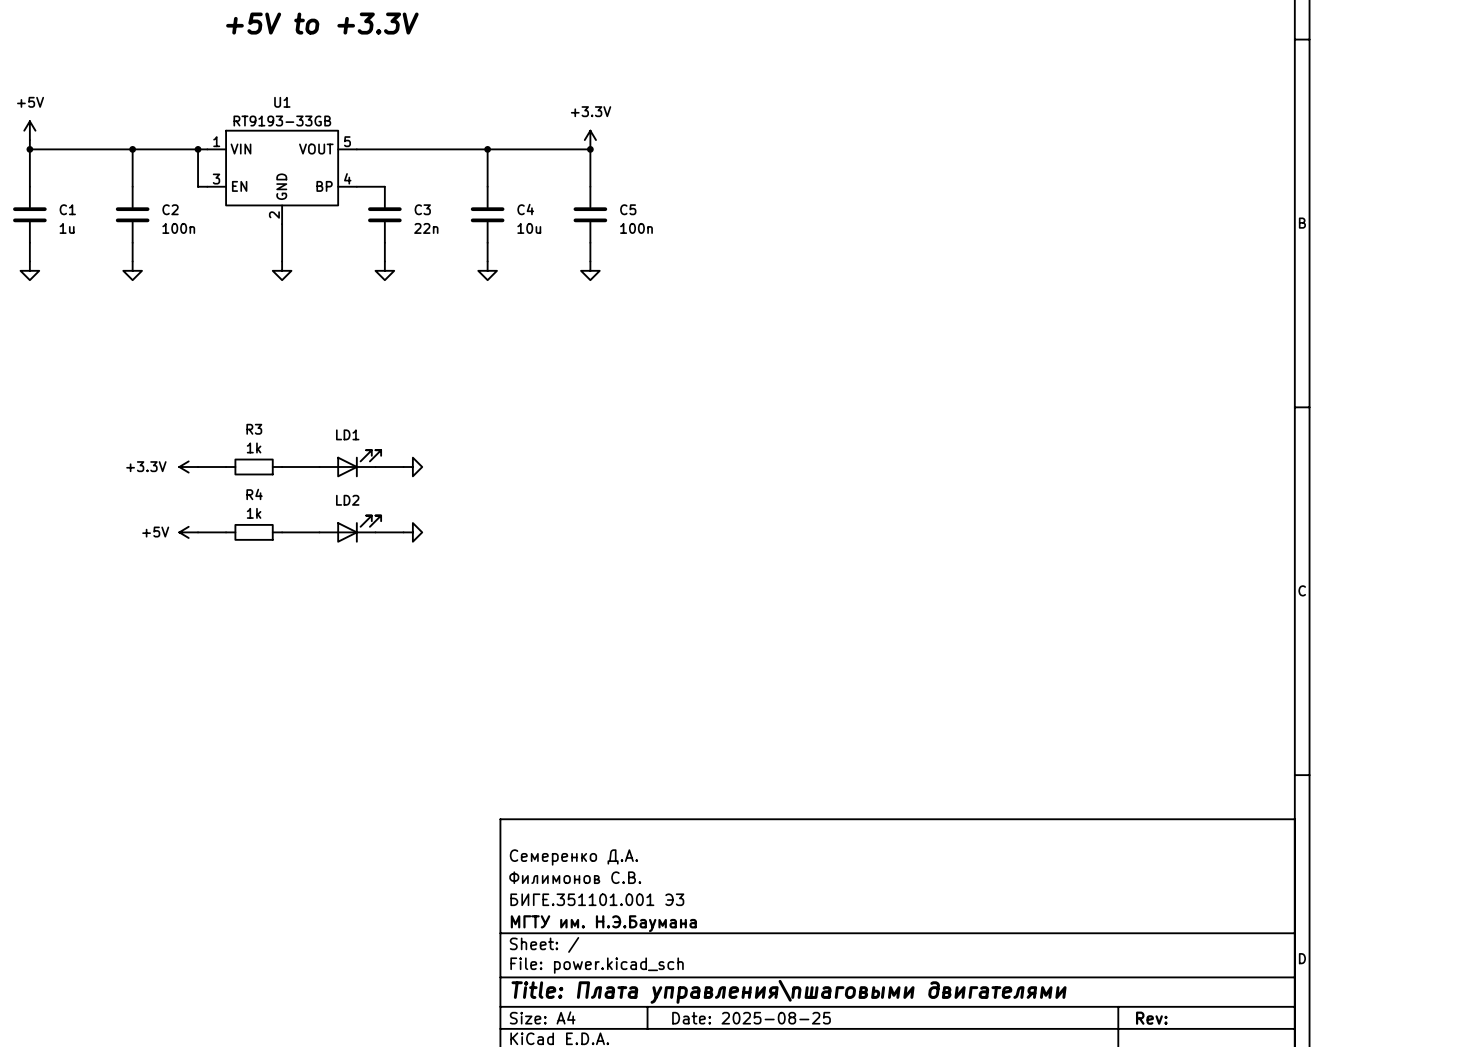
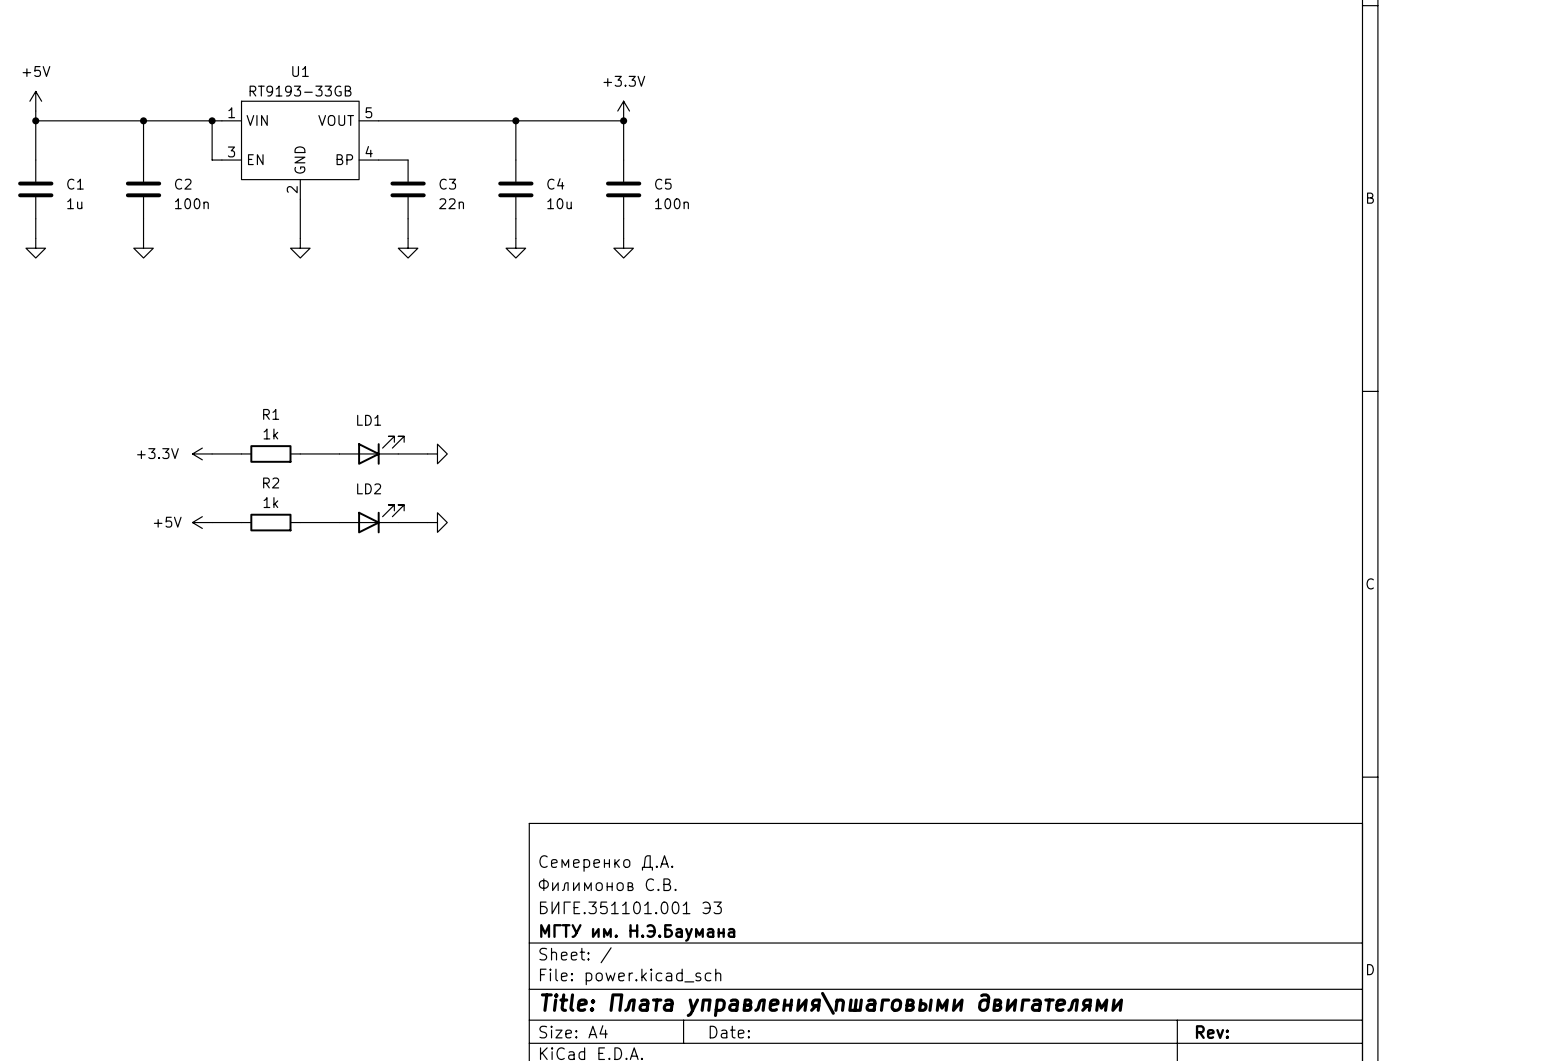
R3 name: R3 (254, 429) -> R1 (271, 414)
R4 name: R4 (254, 494) -> R2 (271, 482)
title block: Date: 2025-08-25 (751, 1018) -> Date: (729, 1032)

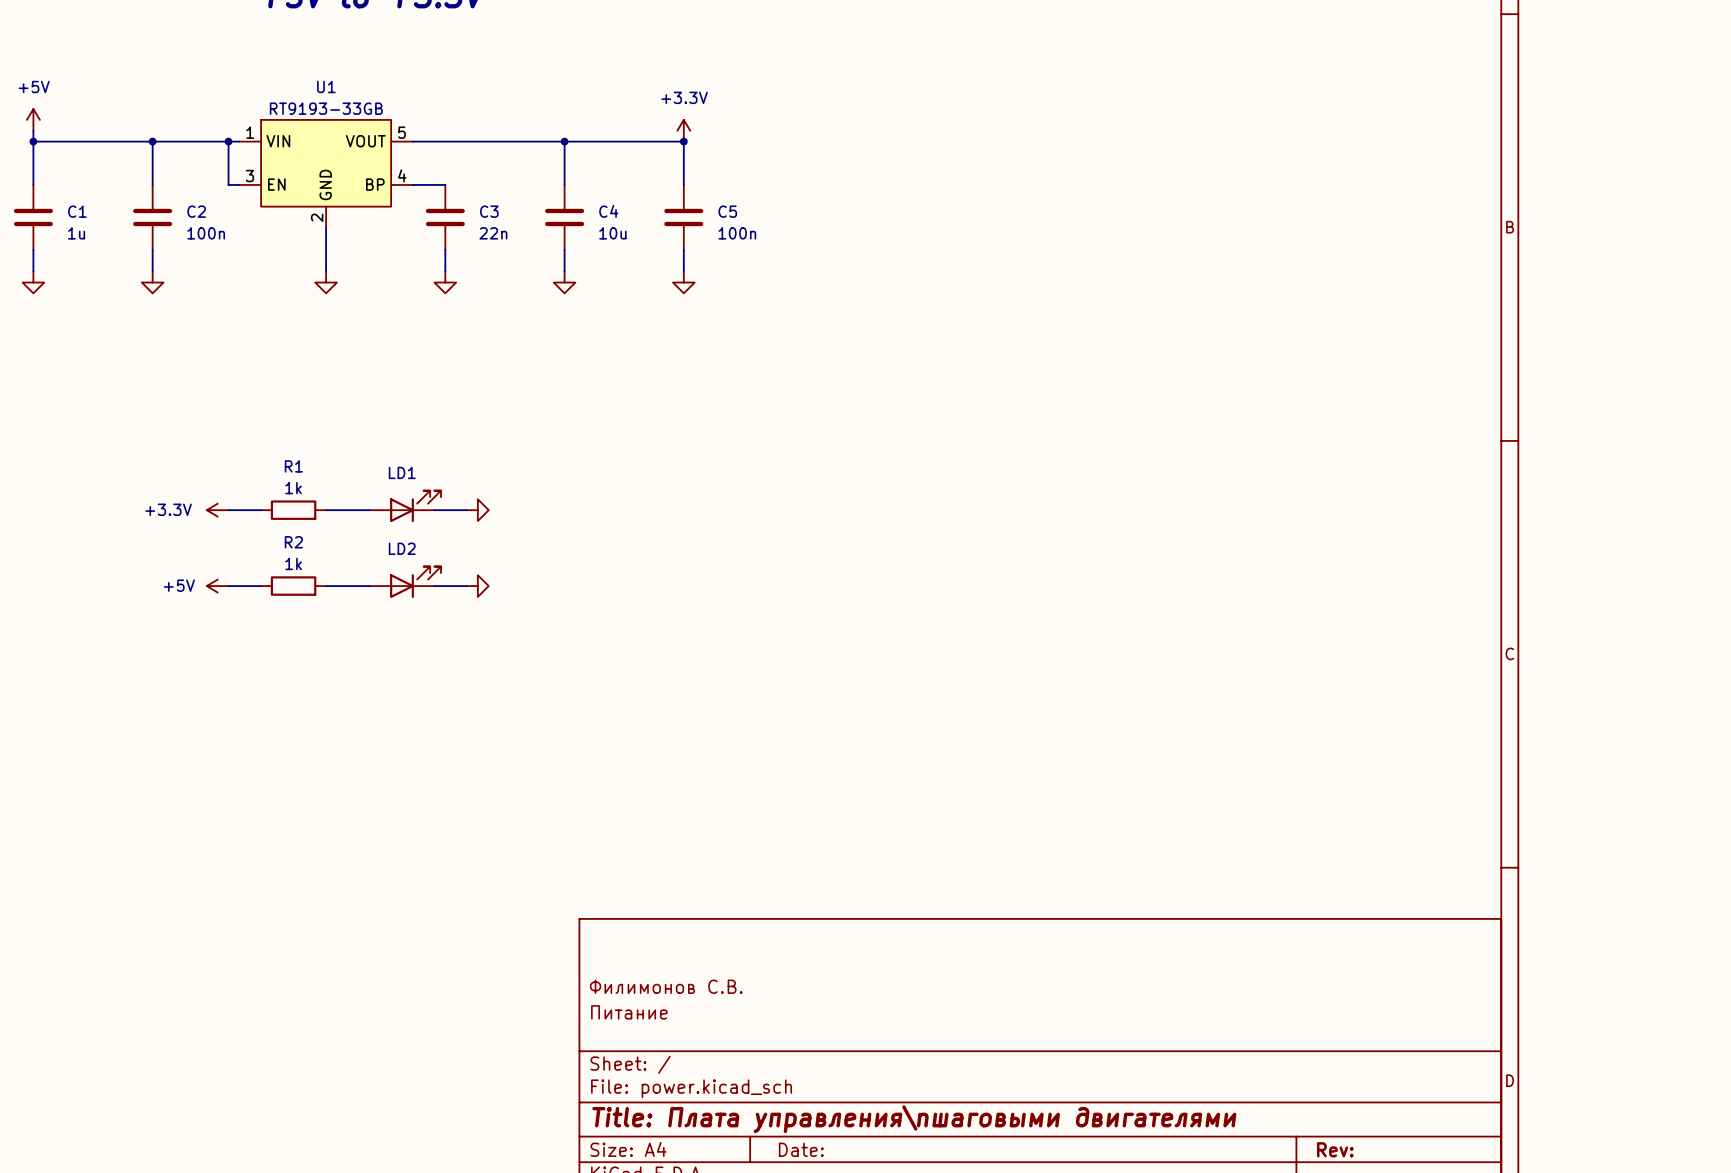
title block: Семеренко Д.А. (606, 863) -> none
title block: БИГЕ.351101.001 Э3 (630, 907) -> Питание (629, 1012)
title block: МГТУ им. Н.Э.Баумана (637, 932) -> none

